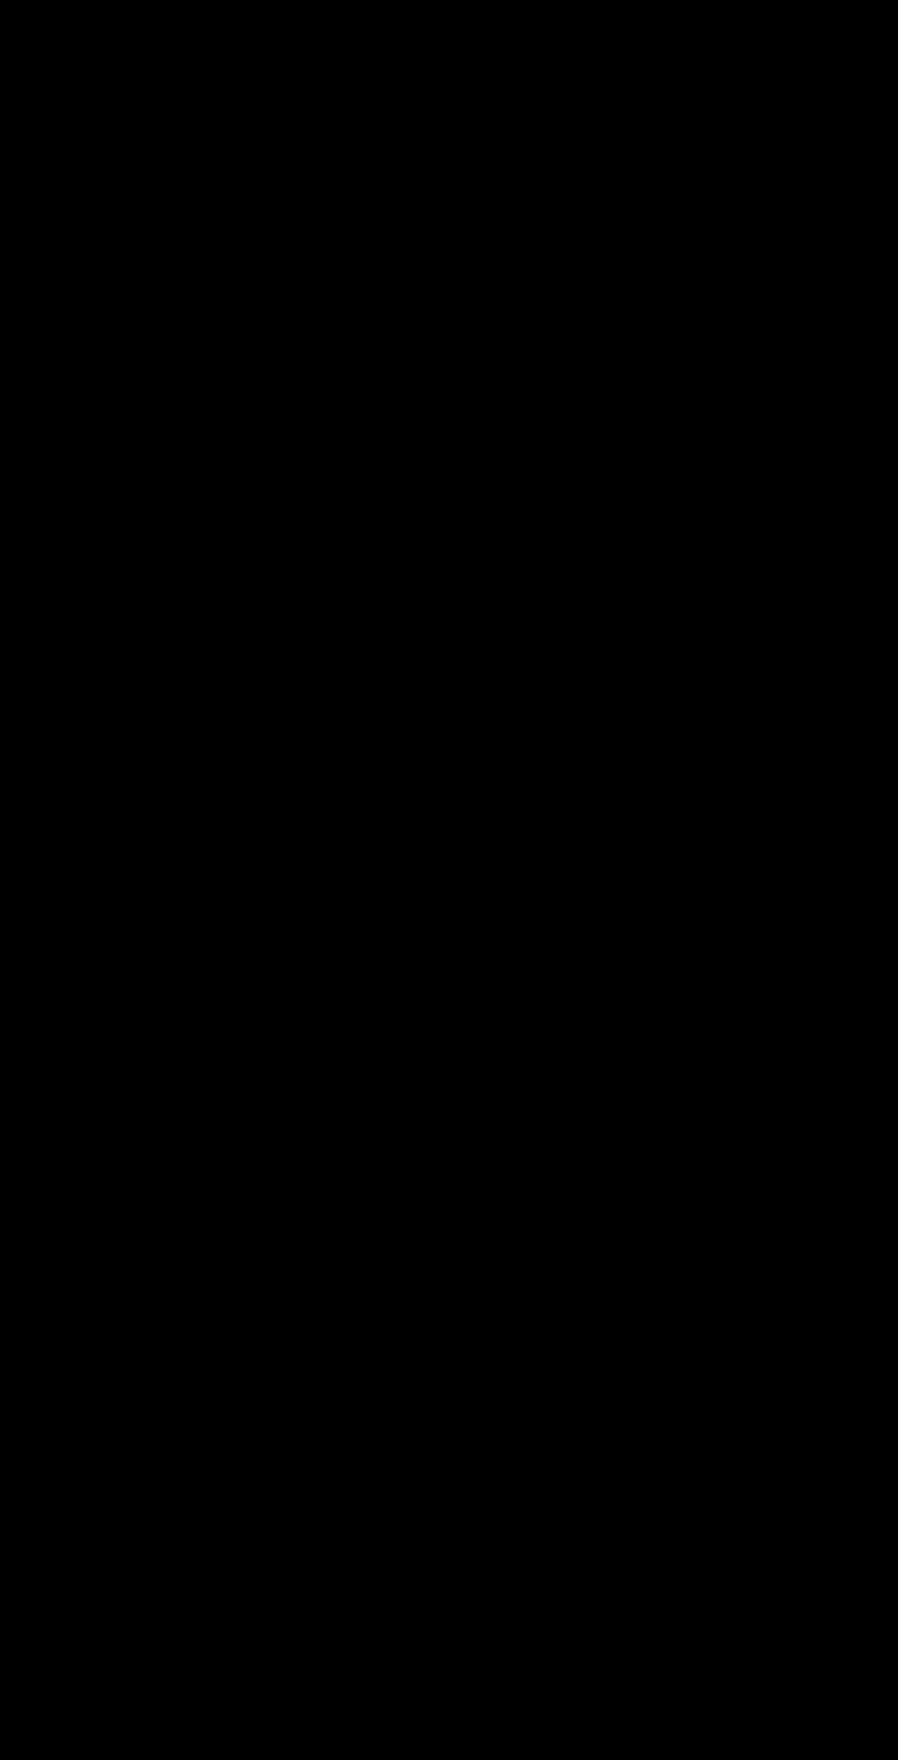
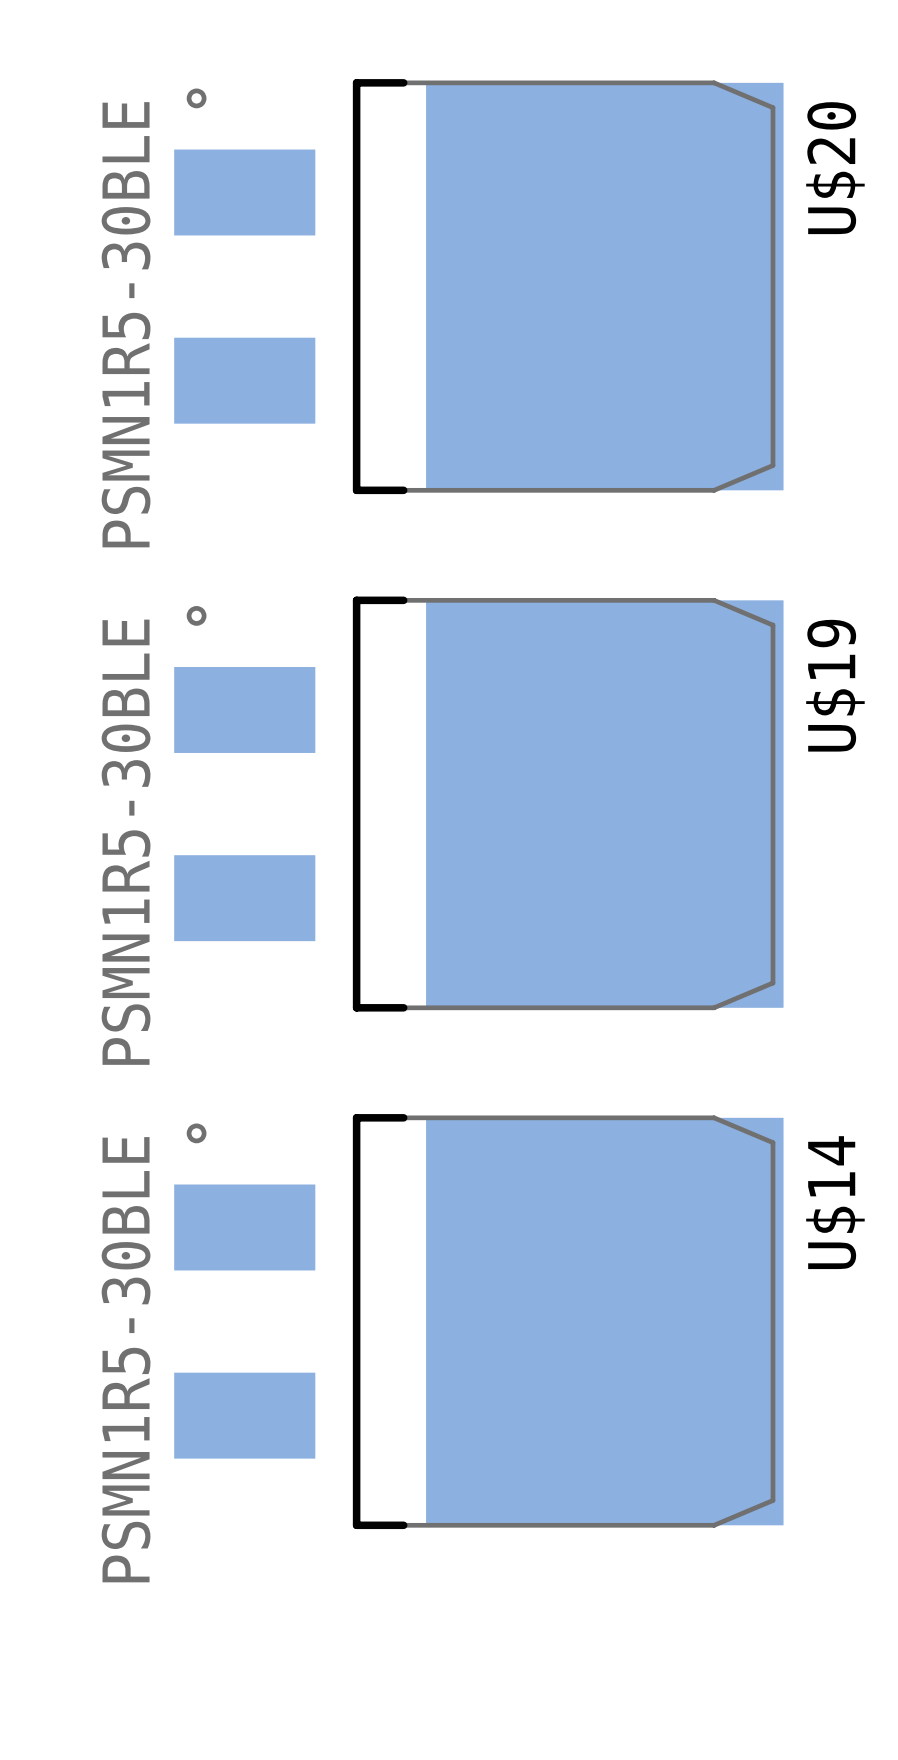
U$20: none -> PSMN1R5-30BLE (478, 286)
U$19: none -> PSMN1R5-30BLE (478, 804)
U$14: none -> PSMN1R5-30BLE (478, 1321)

